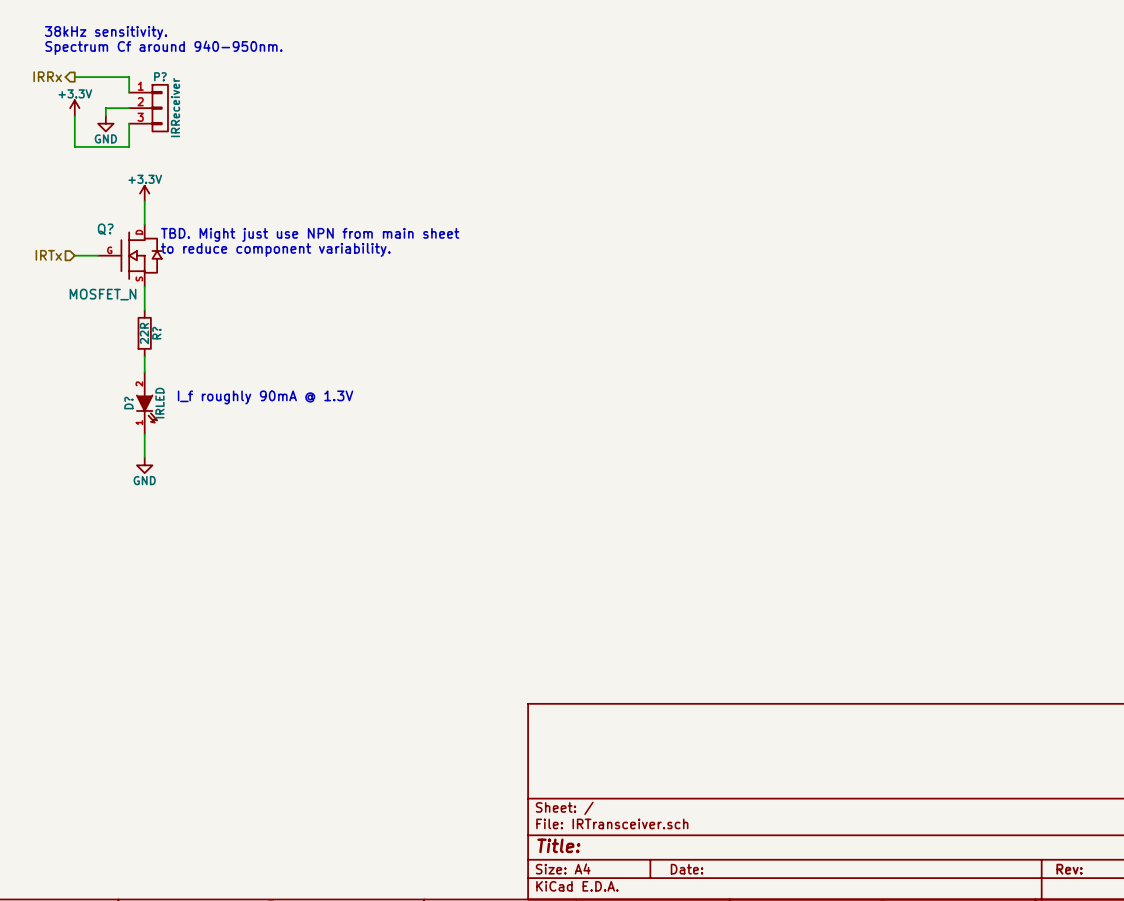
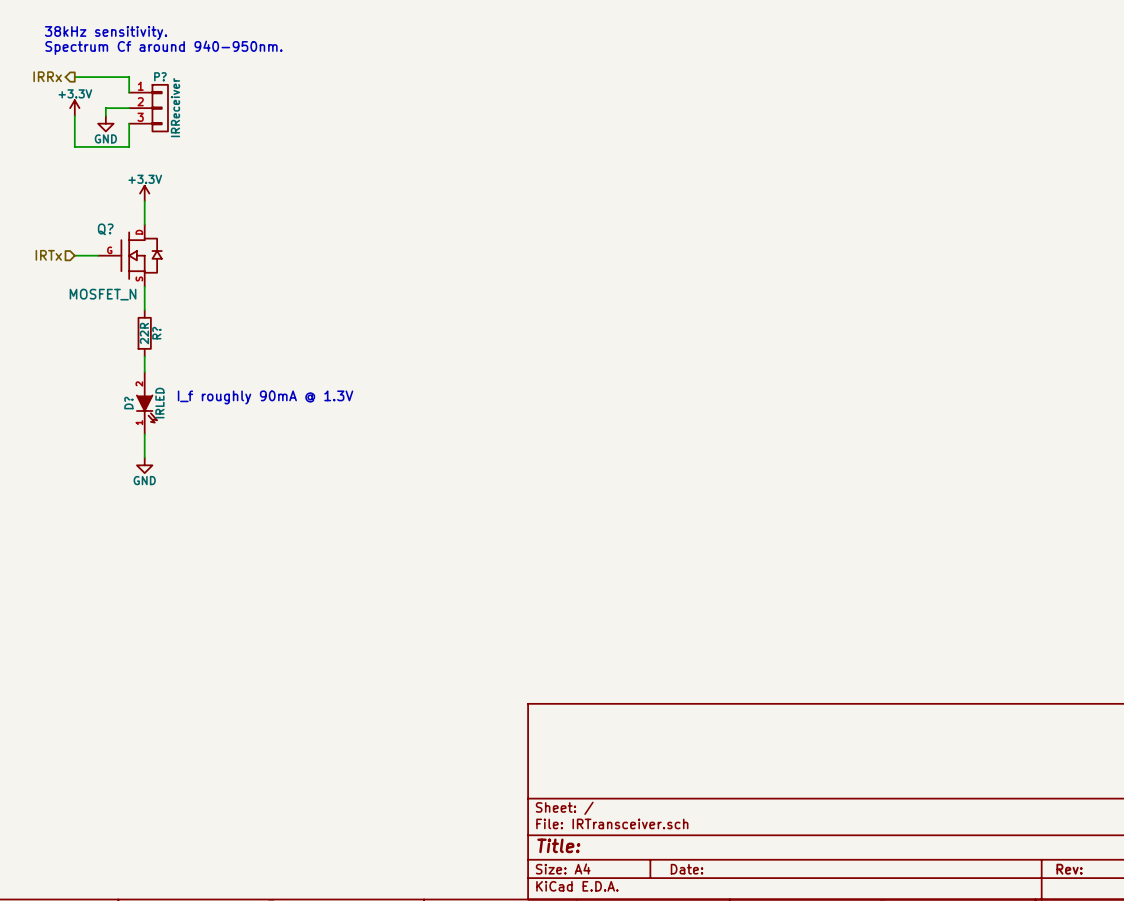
text: TBD. Might just use NPN from main sheet (310, 234) -> none
text: to reduce component variability. (275, 249) -> none

